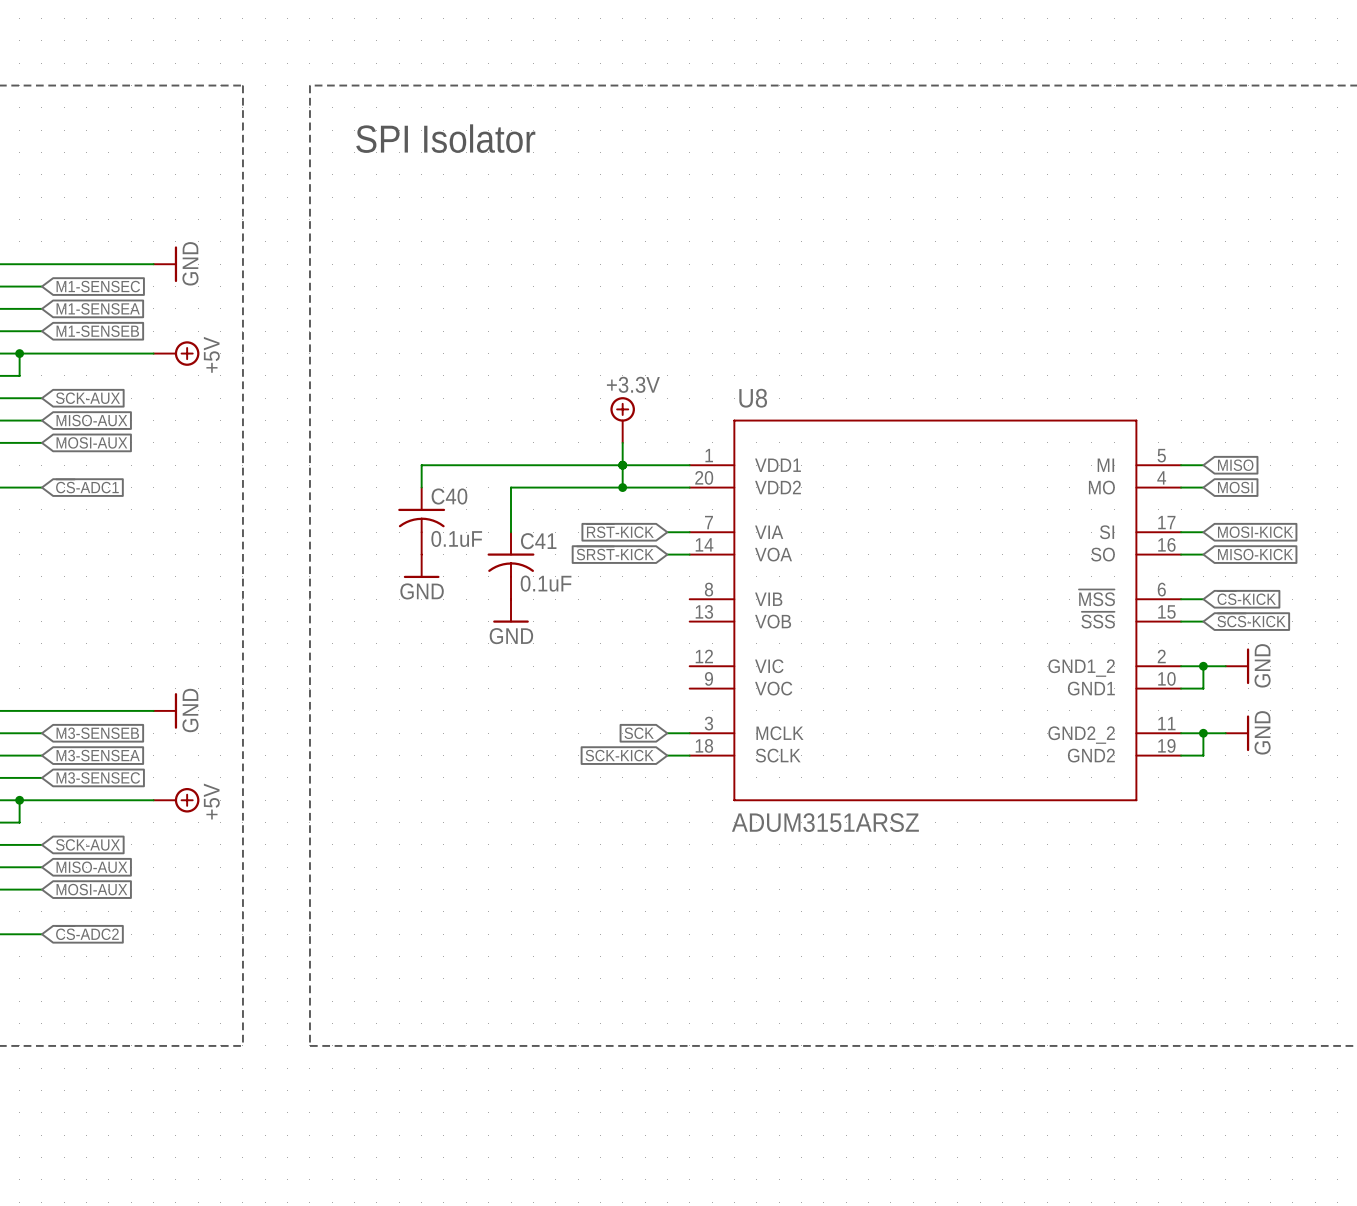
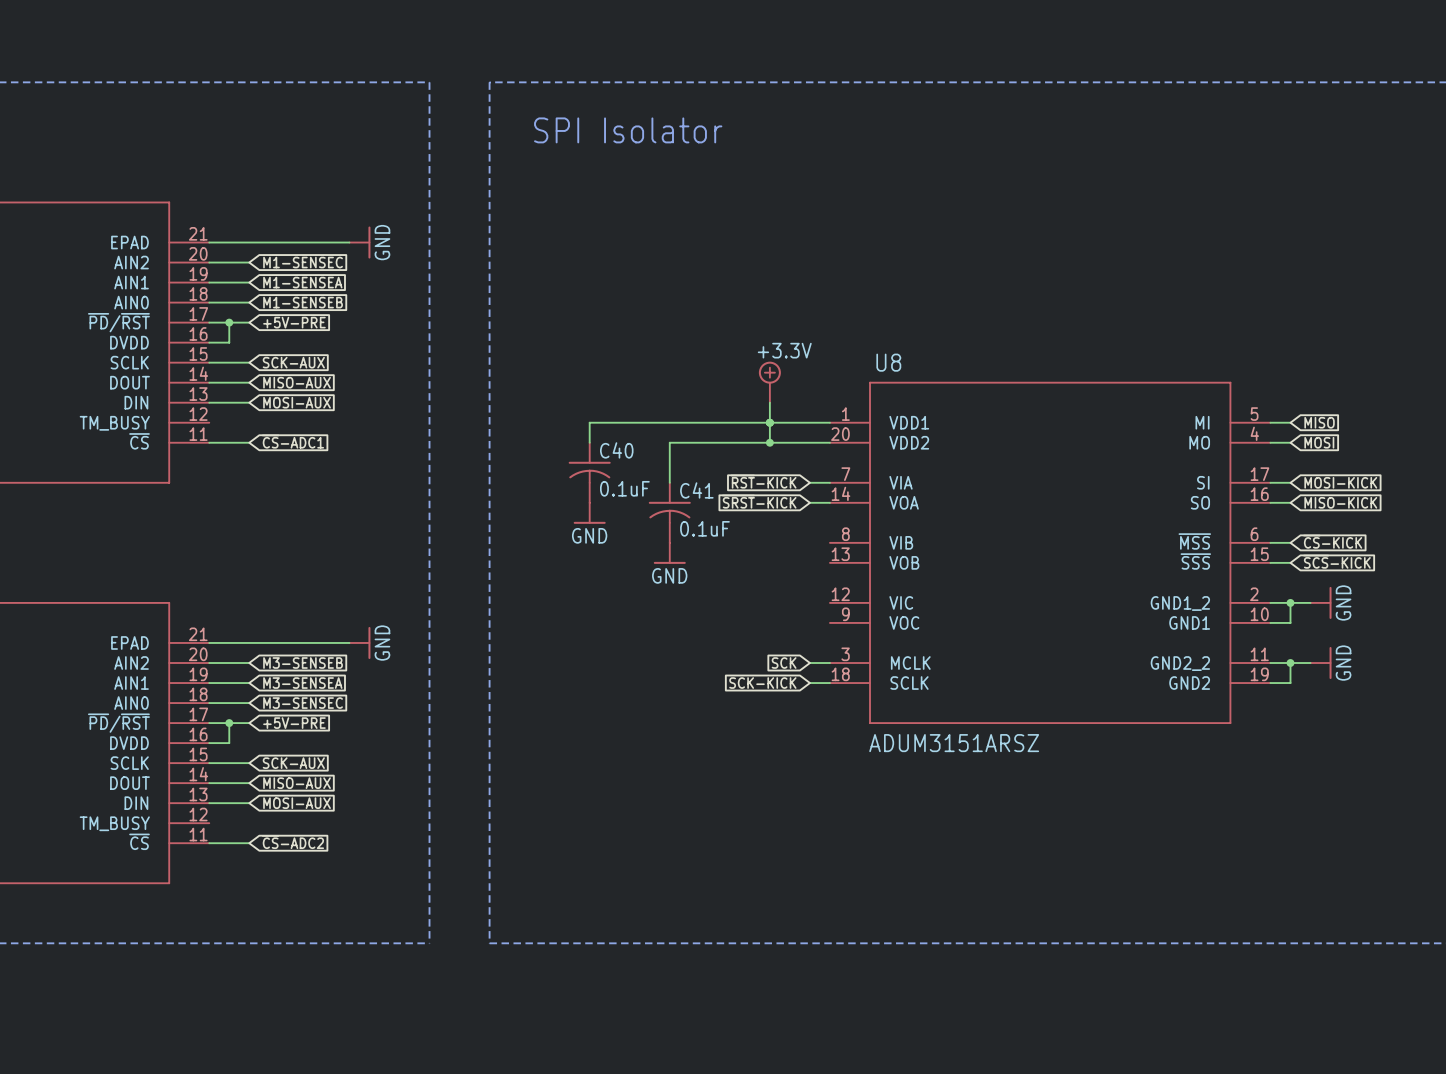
wire: (41, 353) (153, 353) -> none
global label: none -> +5V-PRE (294, 322)
power symbol: +5V (176, 353) -> none
wire: (41, 800) (153, 800) -> none
global label: none -> +5V-PRE (294, 723)
power symbol: +5V (176, 800) -> none

